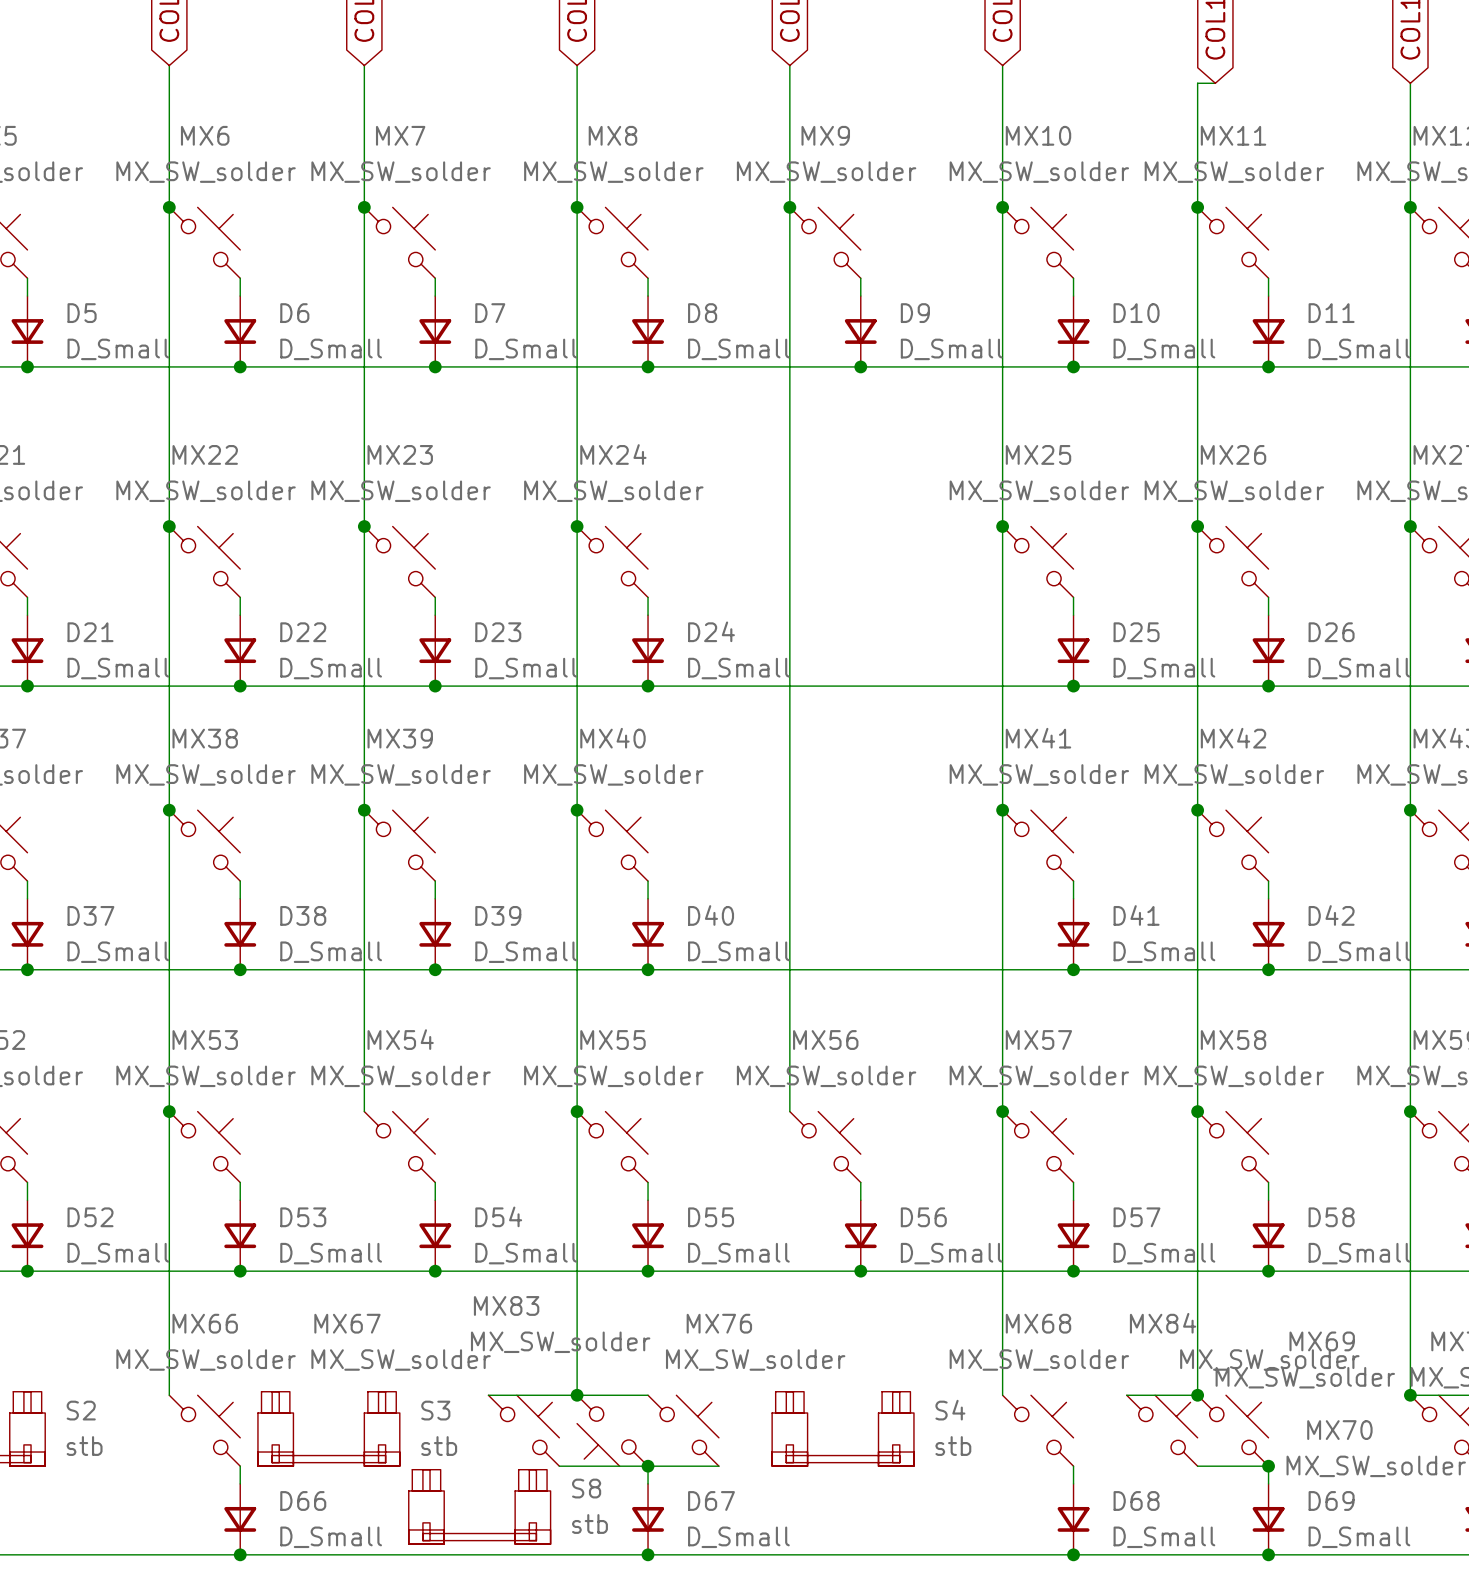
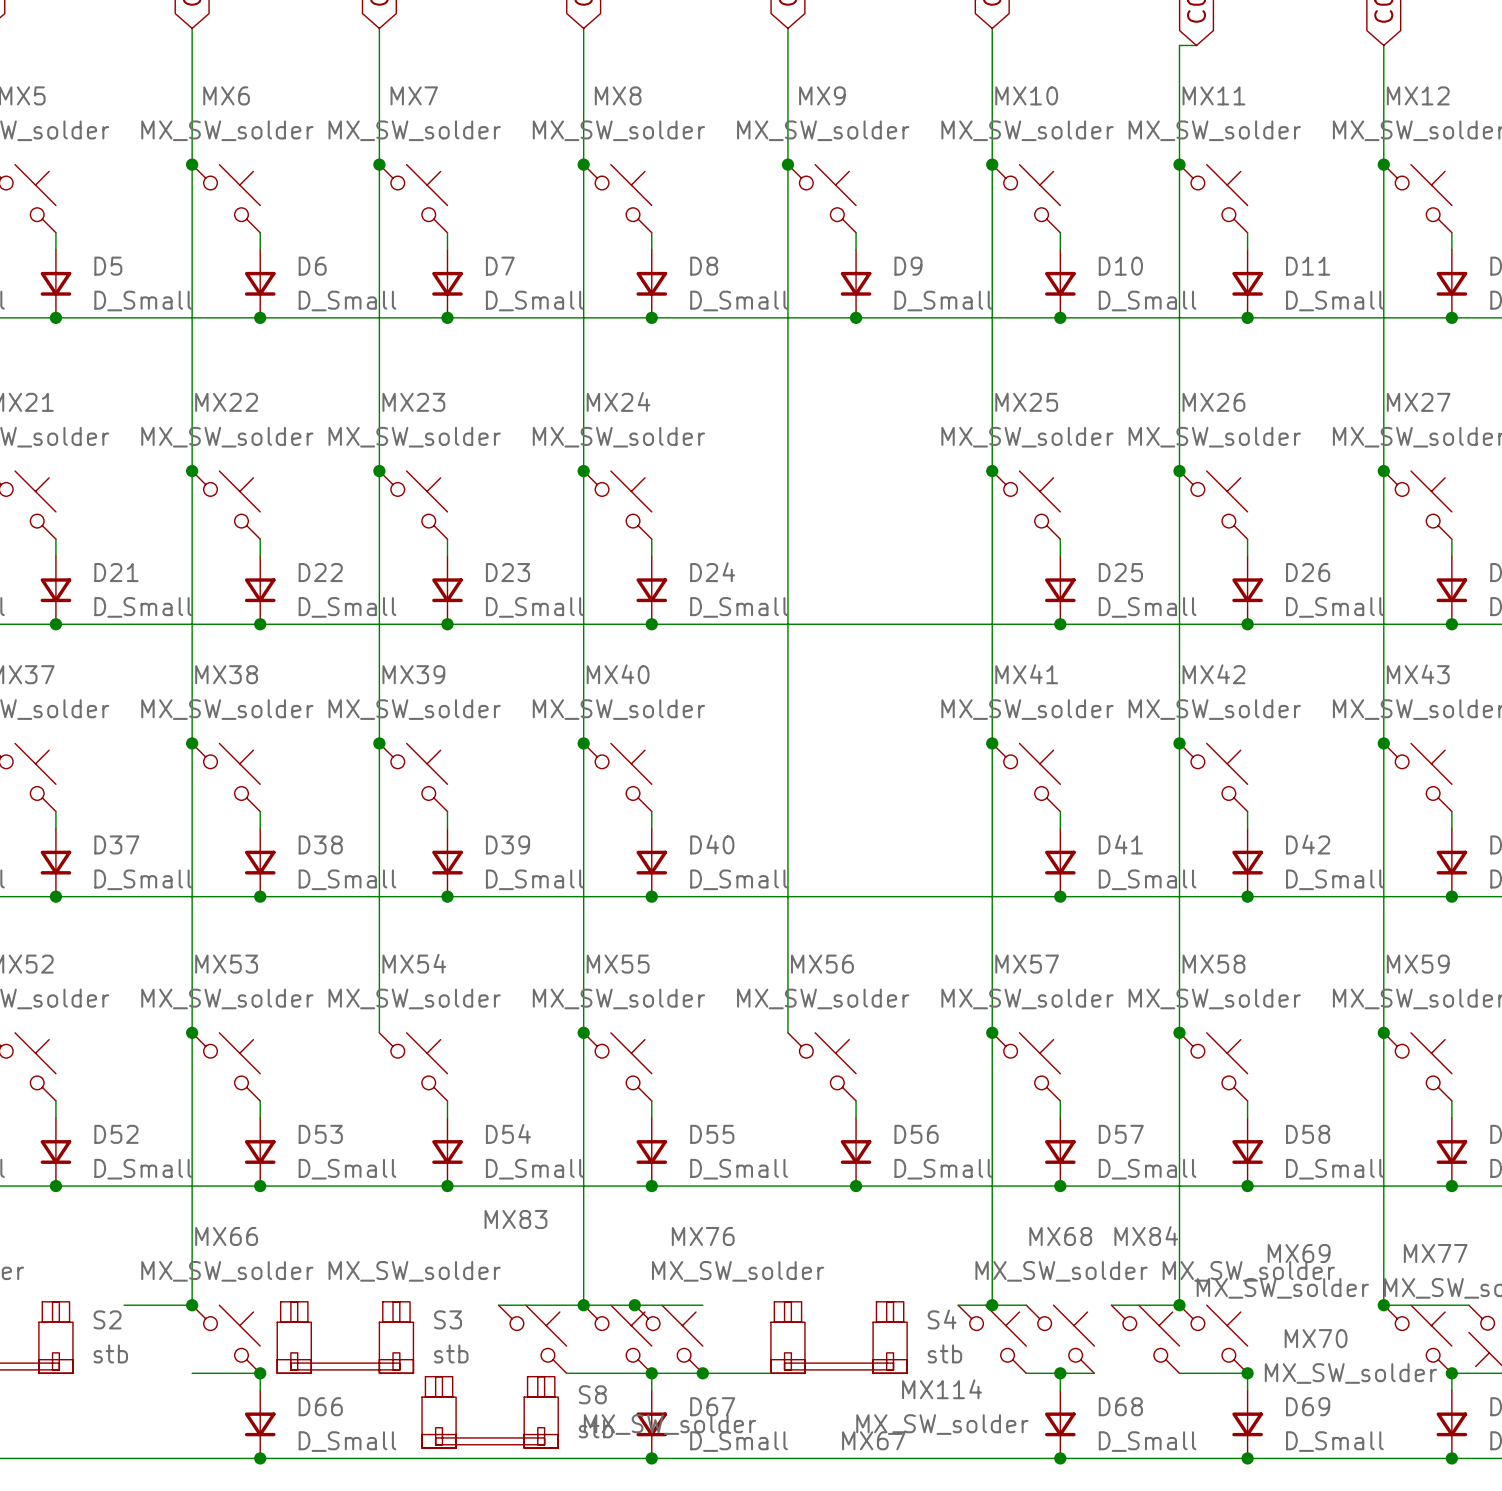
wire: none -> (124, 1305) (192, 1305)
junction: none -> (192, 1305)
junction: none -> (634, 1305)
wire: none -> (651, 1305) (702, 1305)
wire: none -> (958, 1305) (1026, 1305)
junction: none -> (992, 1305)
MX67 rotation: 0° (612, 1430) -> 180° (617, 1339)
MX76 position: (683, 1430) -> (668, 1339)
MX114: none -> MX_SW_solder (992, 1339)
MX68 position: (1038, 1430) -> (1060, 1339)
wire: none -> (192, 1373) (260, 1373)
junction: none -> (260, 1373)
junction: none -> (702, 1373)
wire: none -> (719, 1373) (770, 1373)
wire: none -> (1026, 1373) (1094, 1373)
junction: none -> (1060, 1373)

